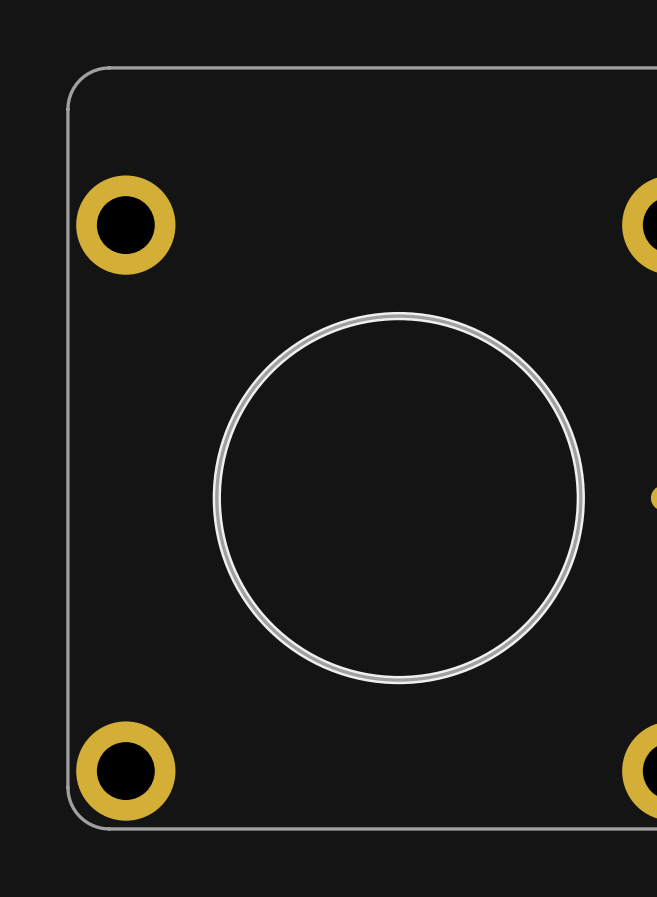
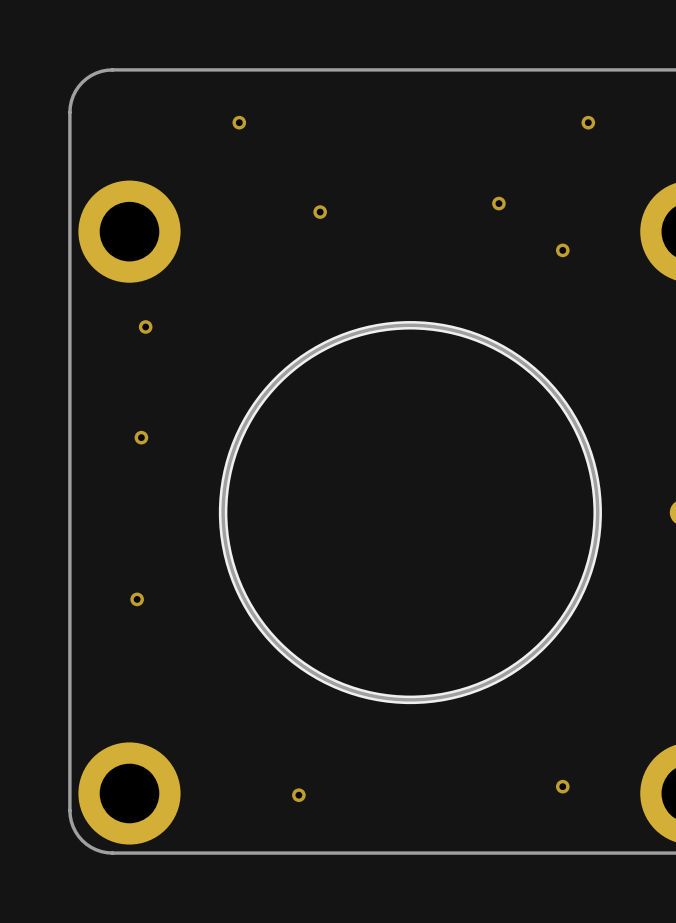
via: none -> (239, 122)
via: none -> (588, 122)
via: none -> (498, 203)
via: none -> (320, 212)
via: none -> (562, 250)
via: none -> (145, 326)
via: none -> (141, 437)
via: none -> (137, 599)
via: none -> (562, 786)
via: none -> (298, 795)

